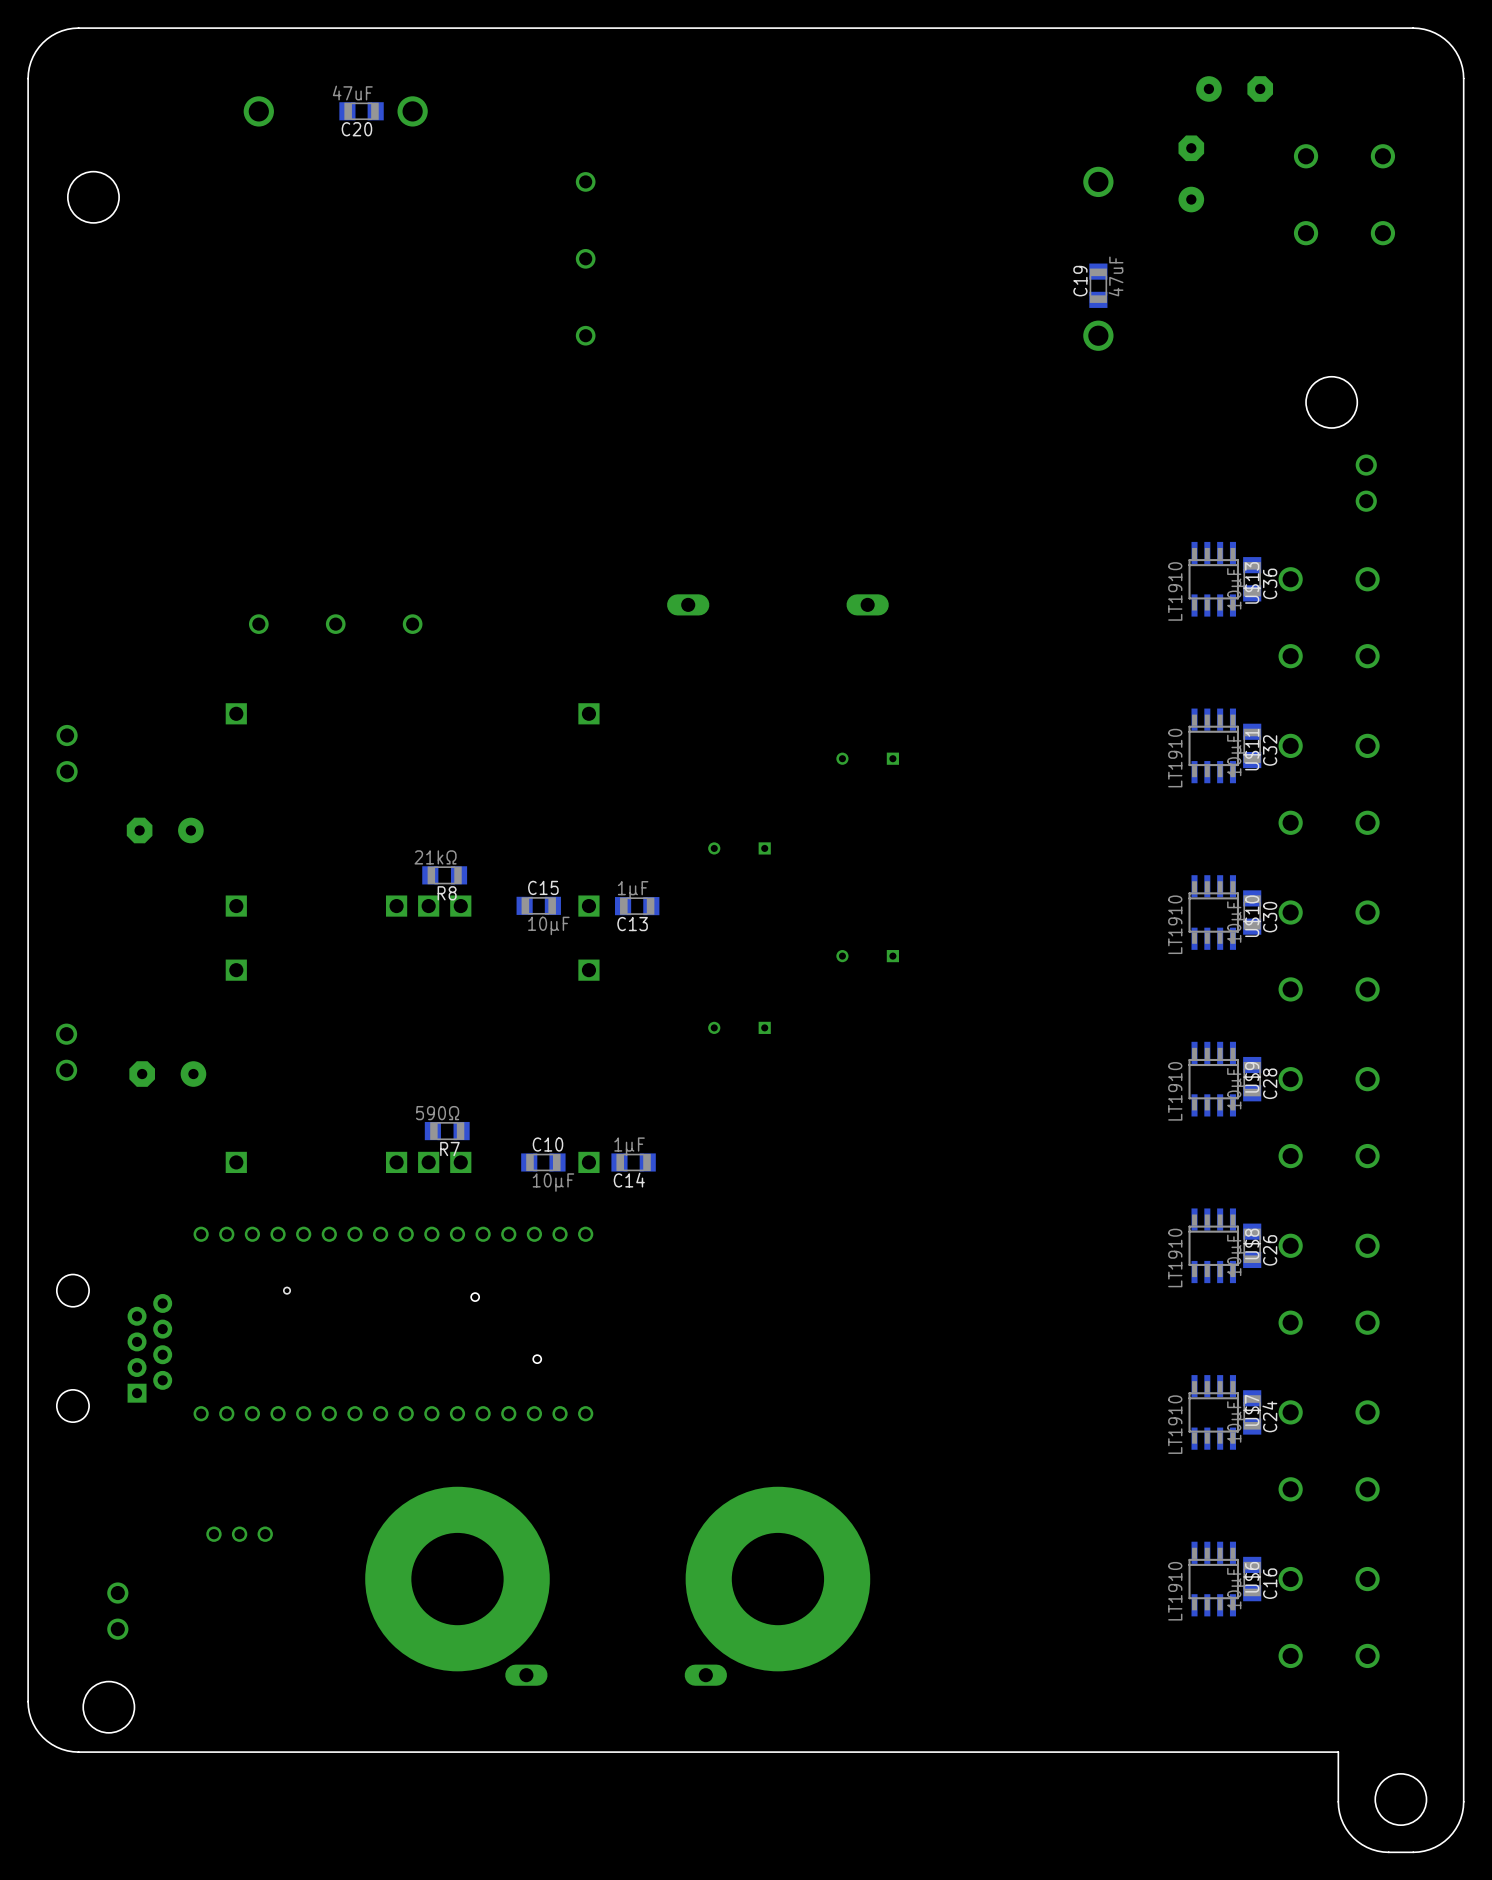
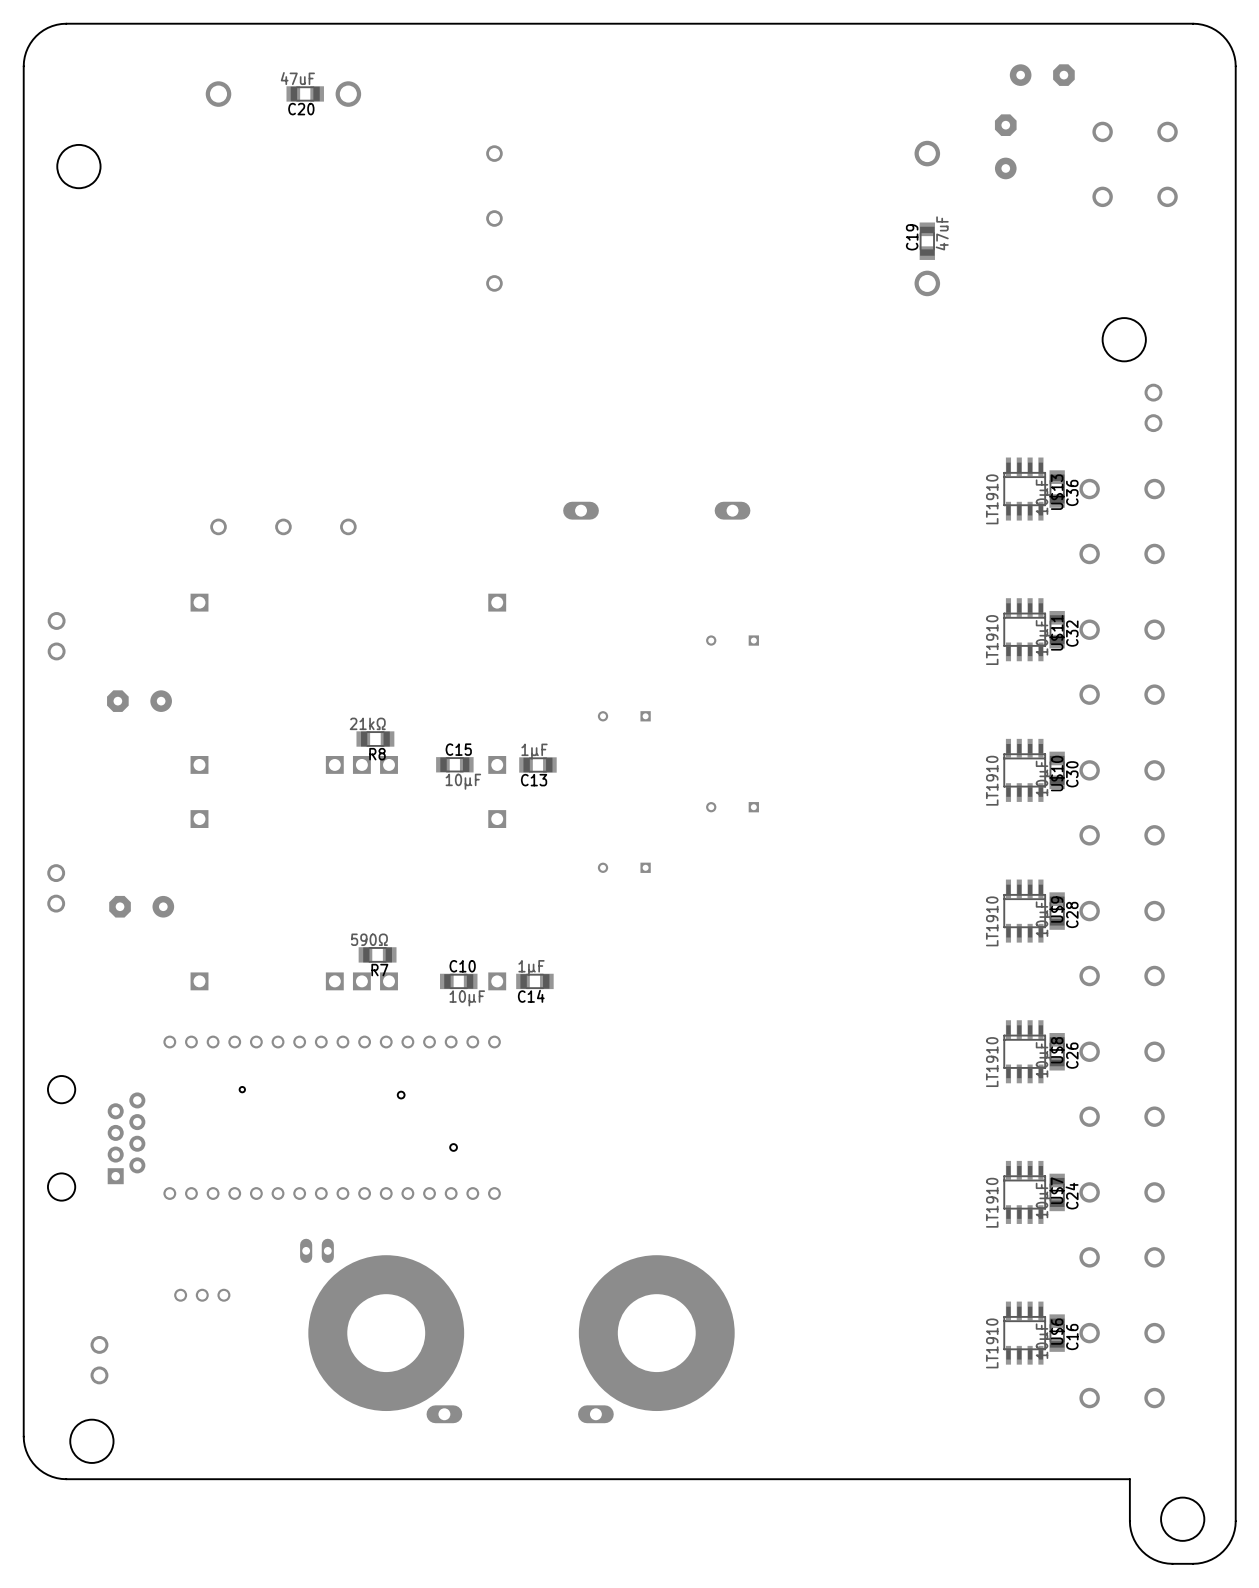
part: none -> (316, 1250)

